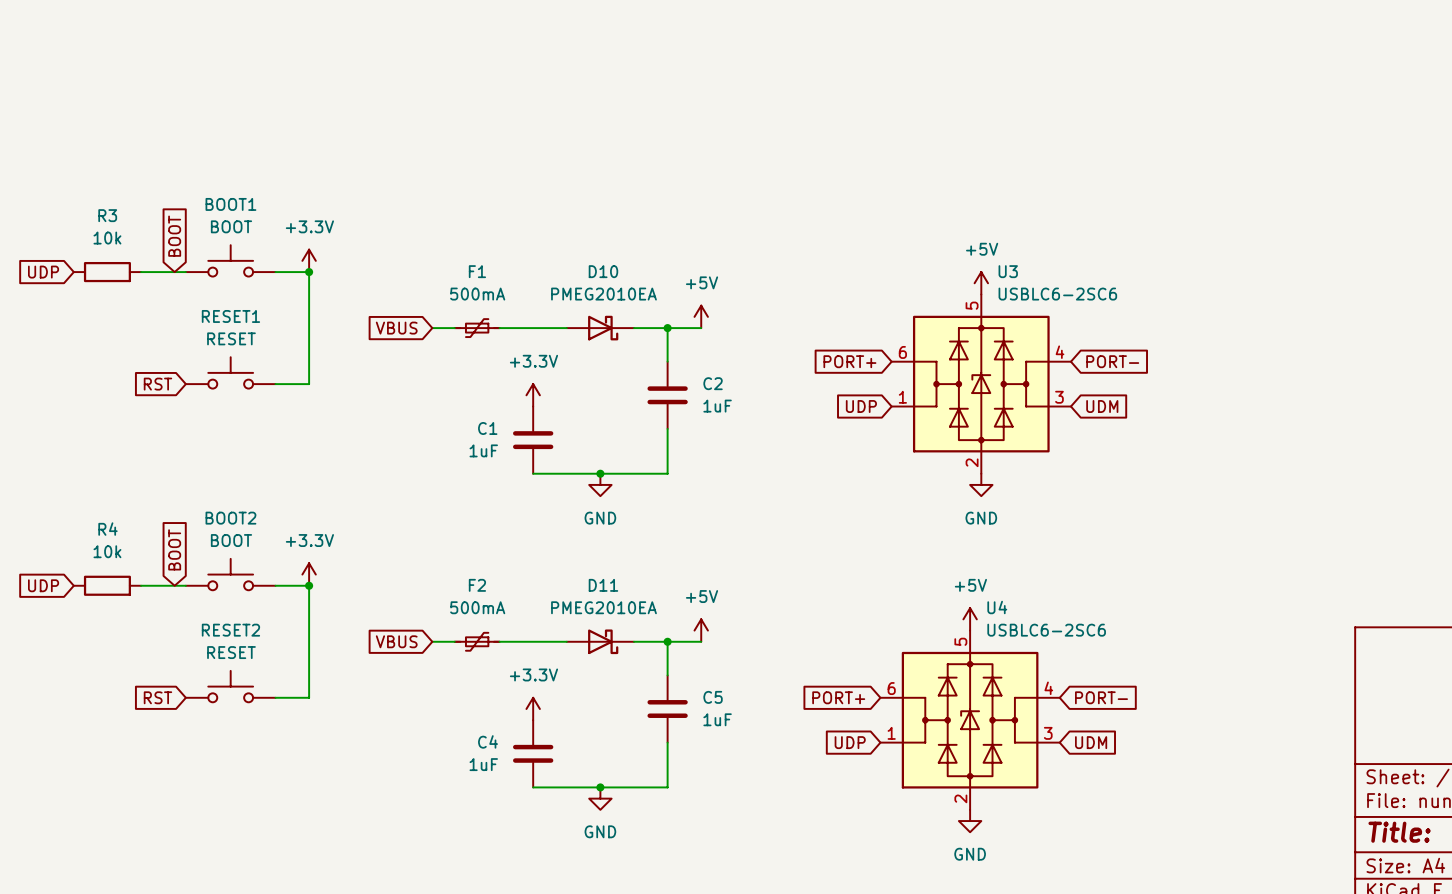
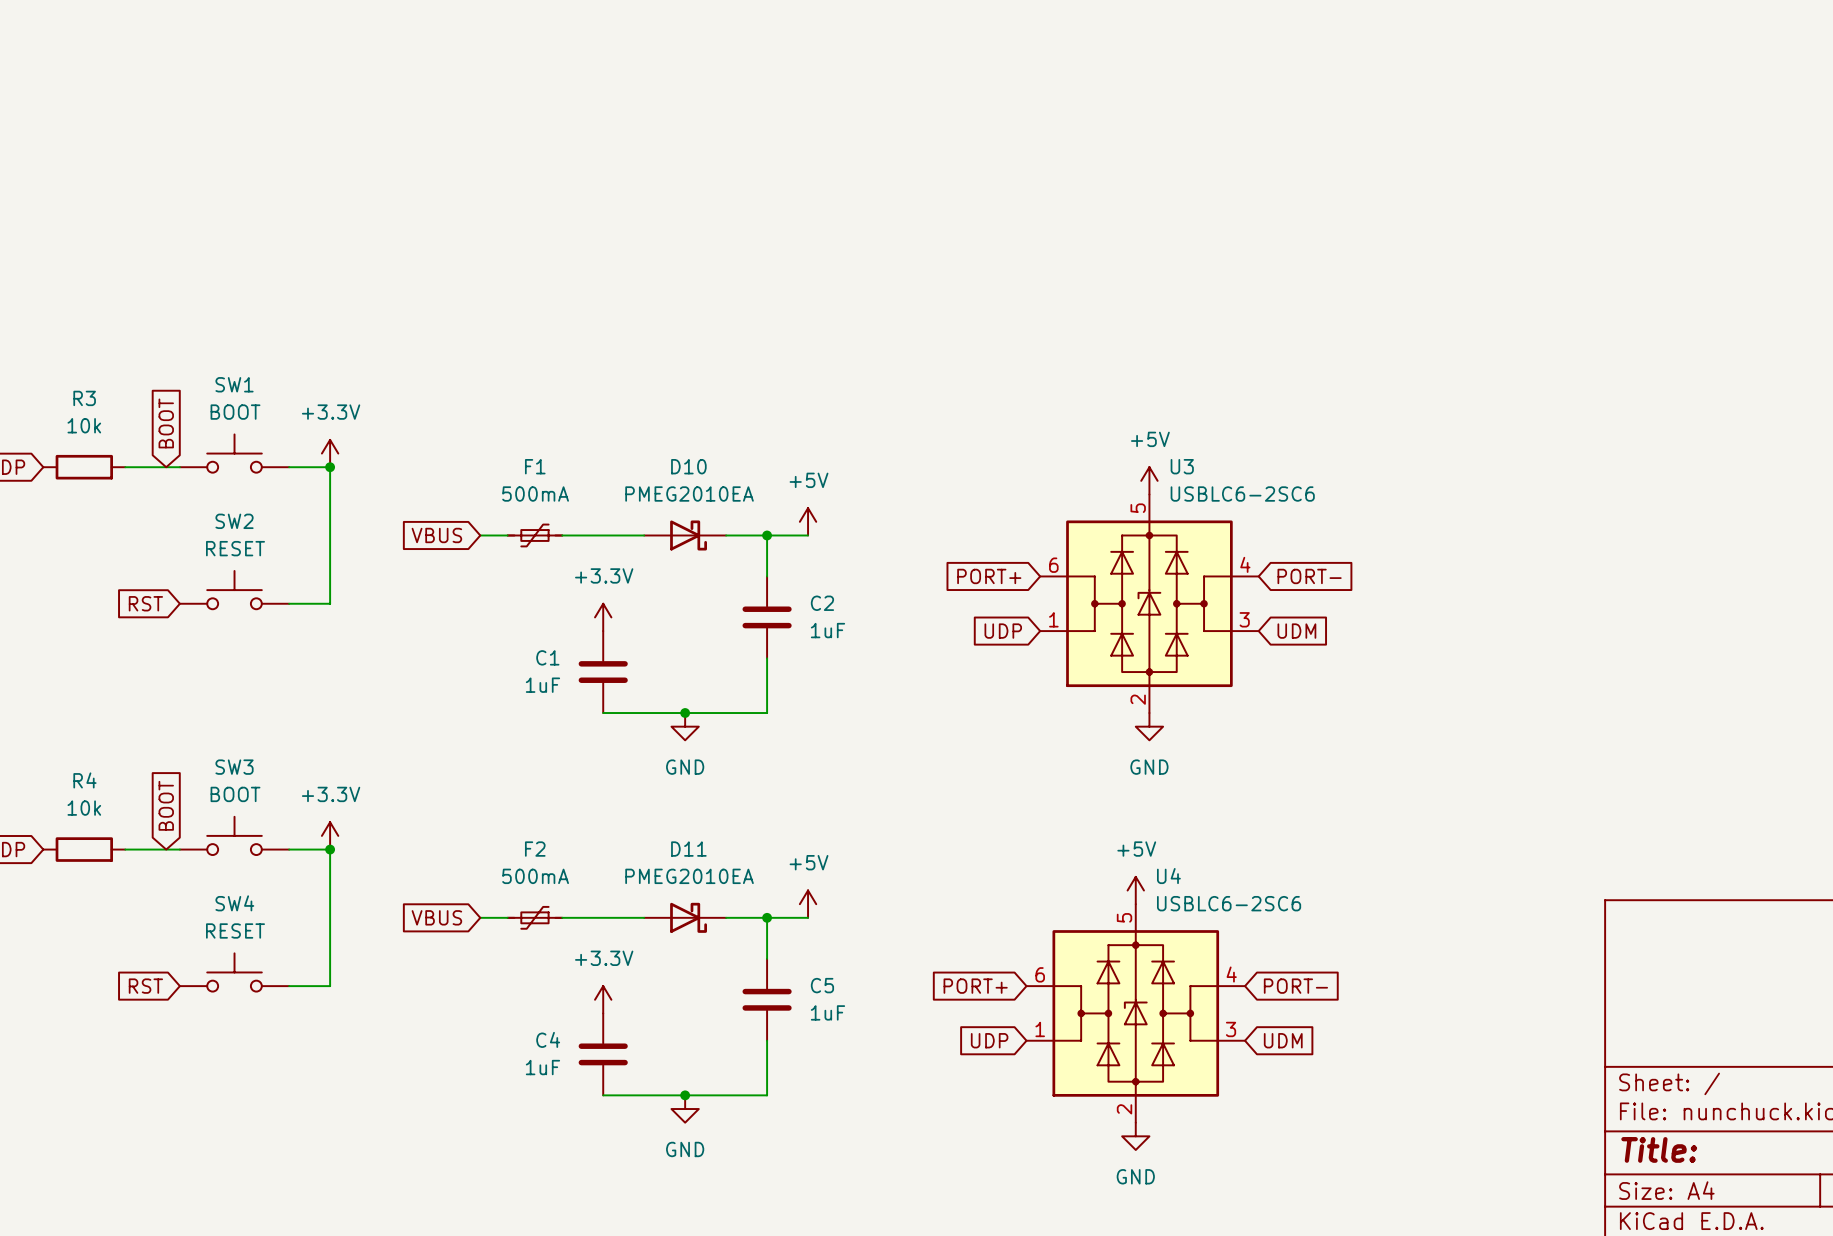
BOOT1 name: BOOT1 (230, 204) -> SW1 (234, 384)
RESET1 name: RESET1 (230, 316) -> SW2 (234, 521)
BOOT2 name: BOOT2 (230, 518) -> SW3 (234, 767)
RESET2 name: RESET2 (230, 630) -> SW4 (234, 903)

